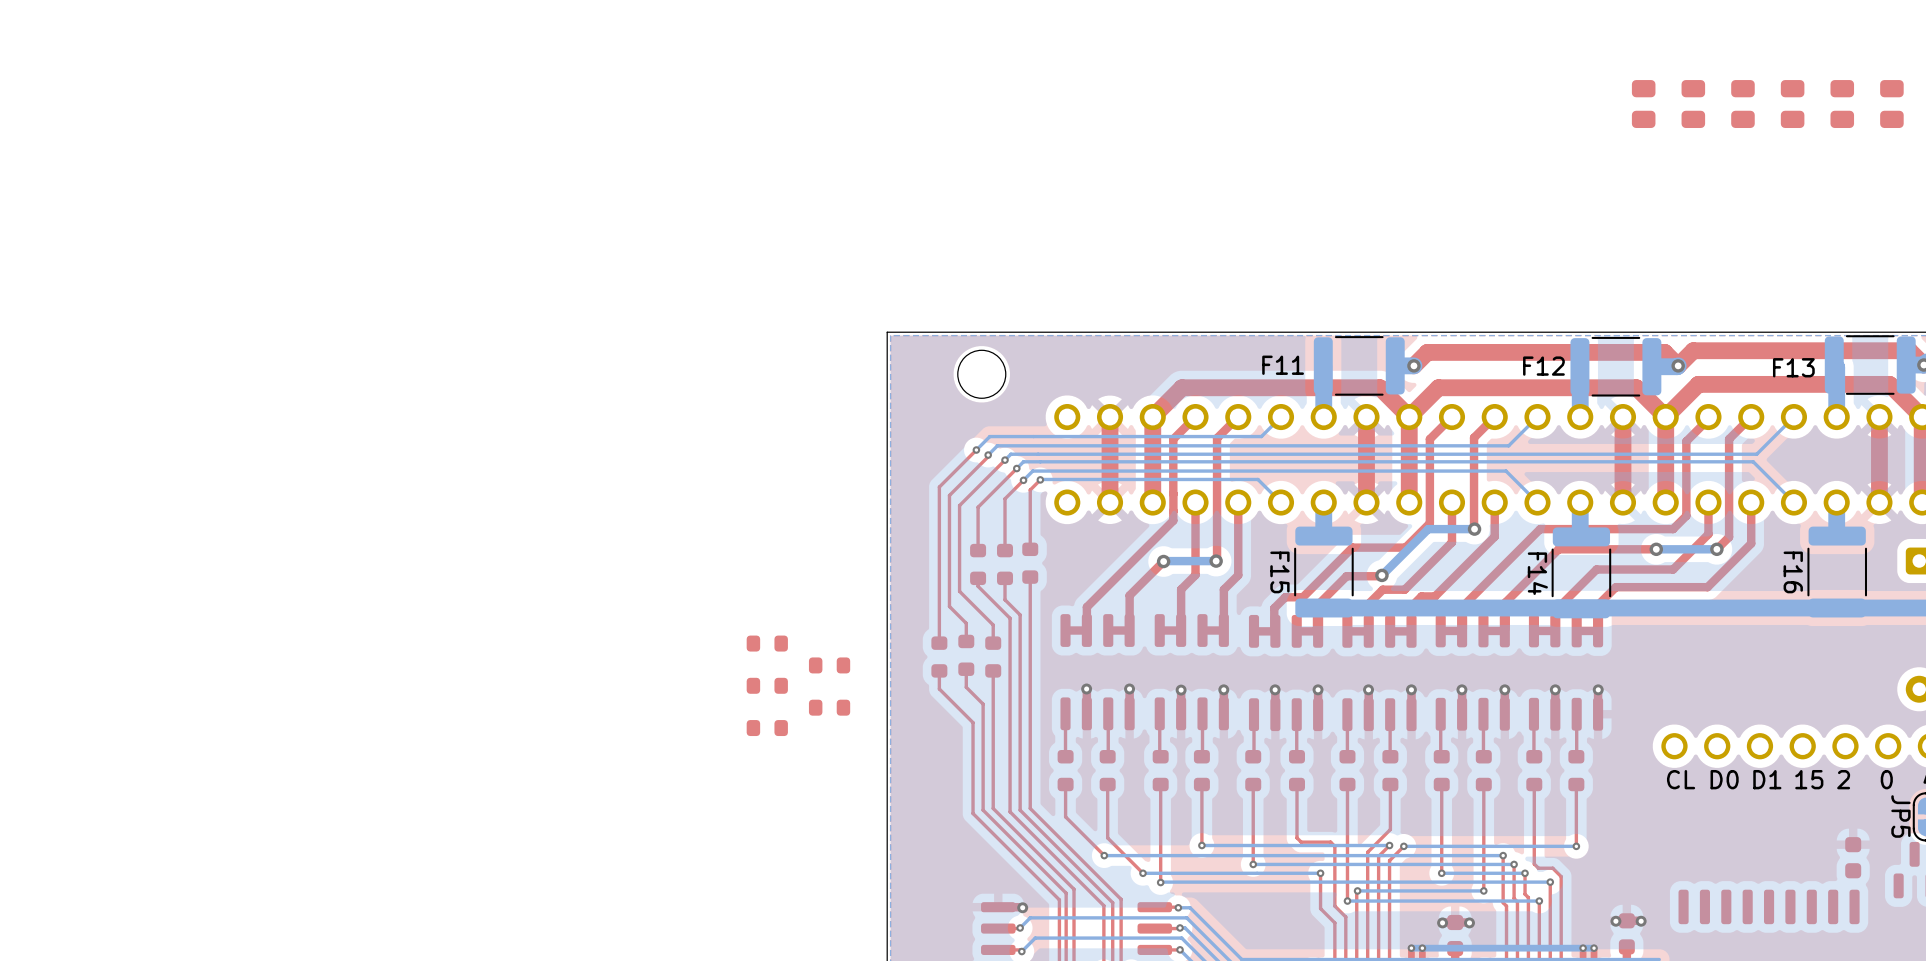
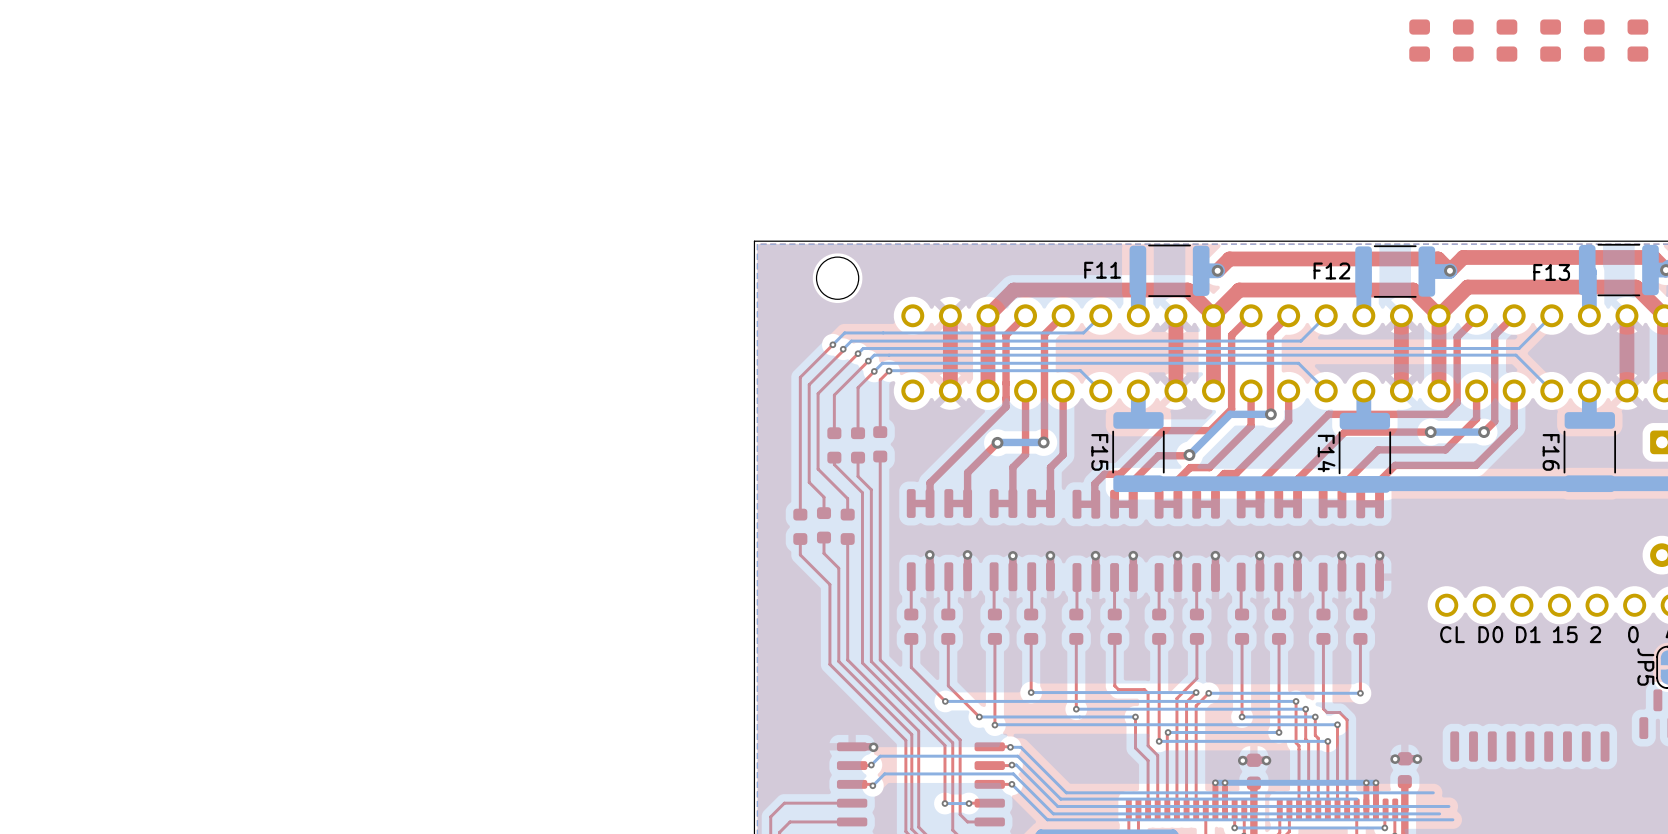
part: (767, 643) -> none
part: (829, 665) -> none
part: (767, 685) -> none
part: (829, 707) -> none
part: (767, 728) -> none
part: (1853, 857) -> none

